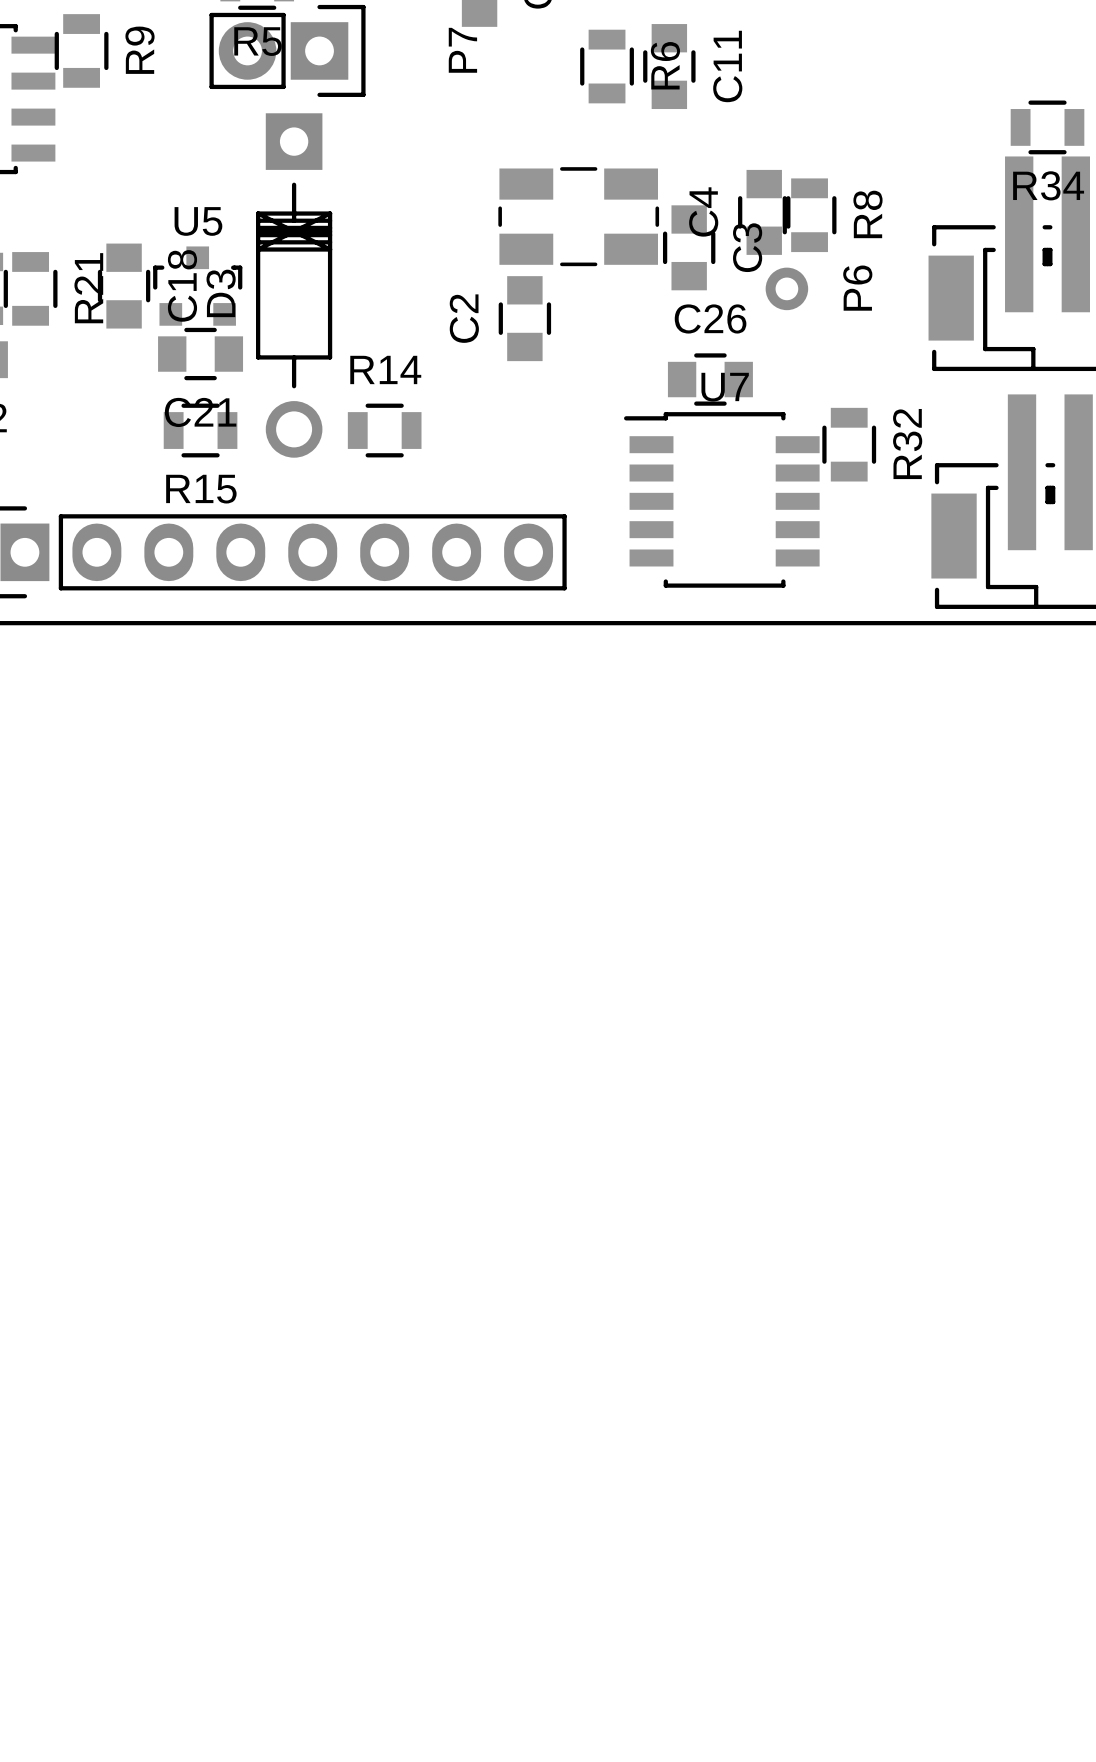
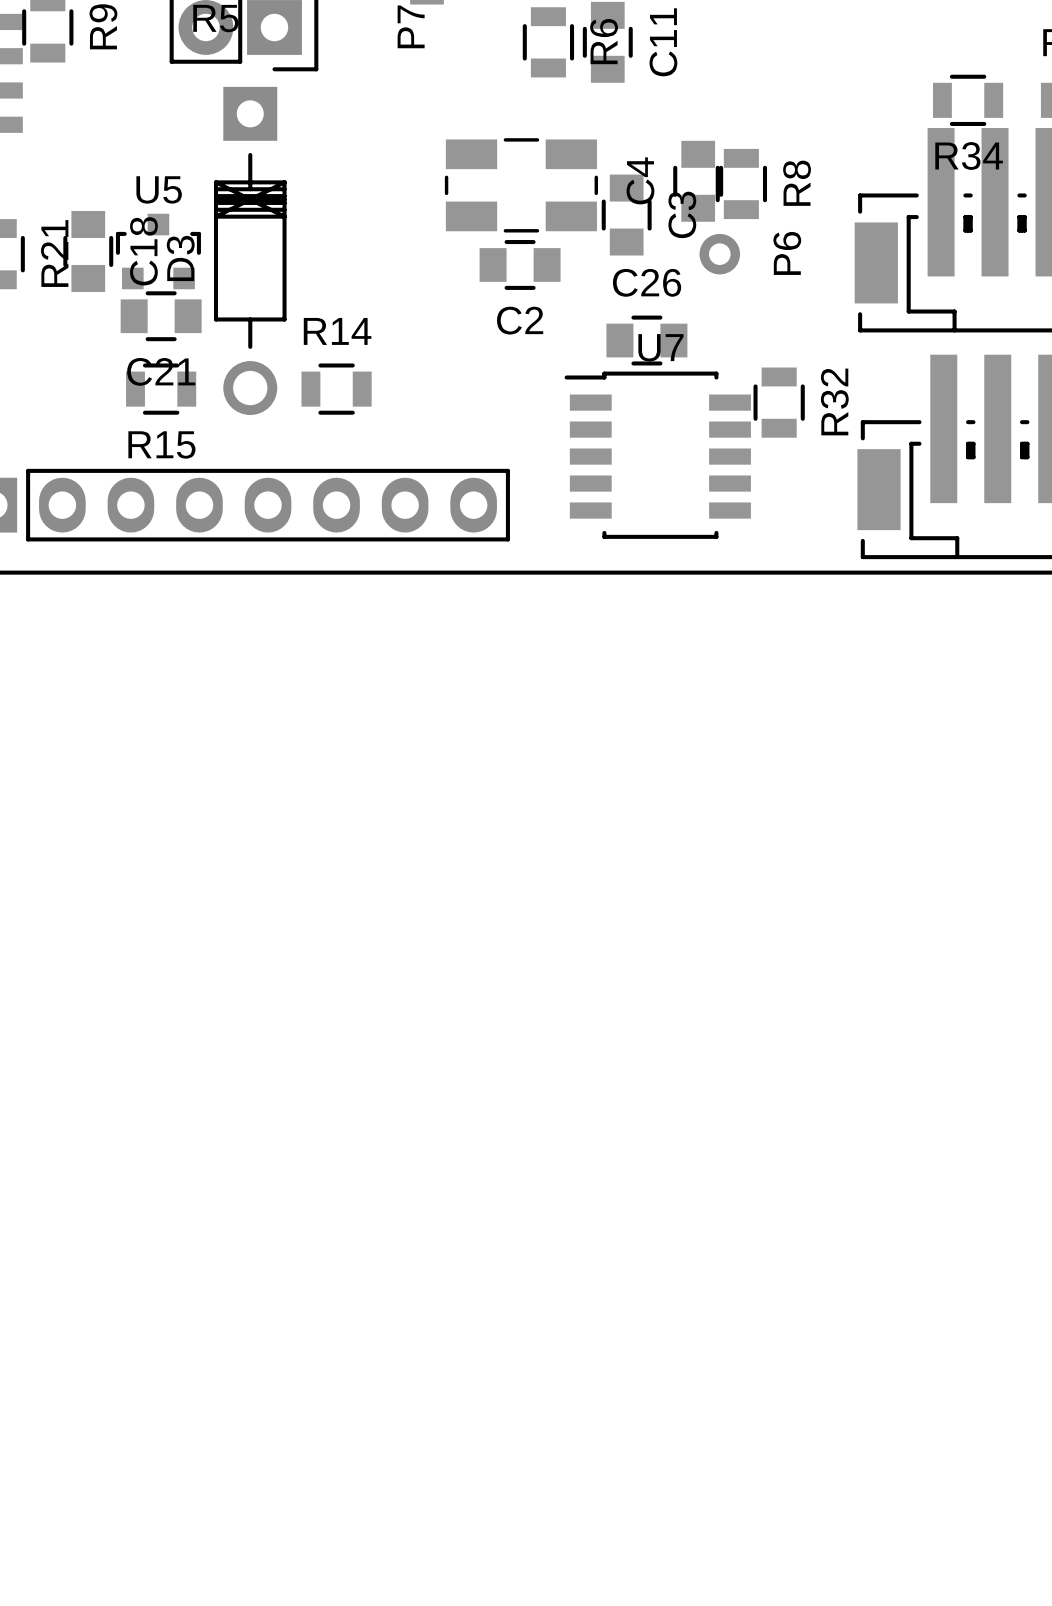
C2 name position: C2 (464, 318) -> C2 (520, 320)
C2 rotation: 0° (524, 318) -> 90° clockwise (520, 264)
C2 position: (524, 318) -> (520, 264)

